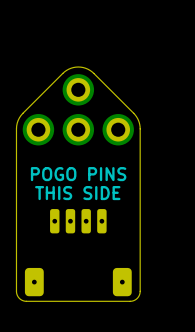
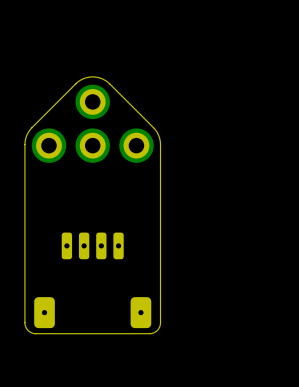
text: POGO PINS (78, 174) -> none
text: THIS SIDE (77, 193) -> none

